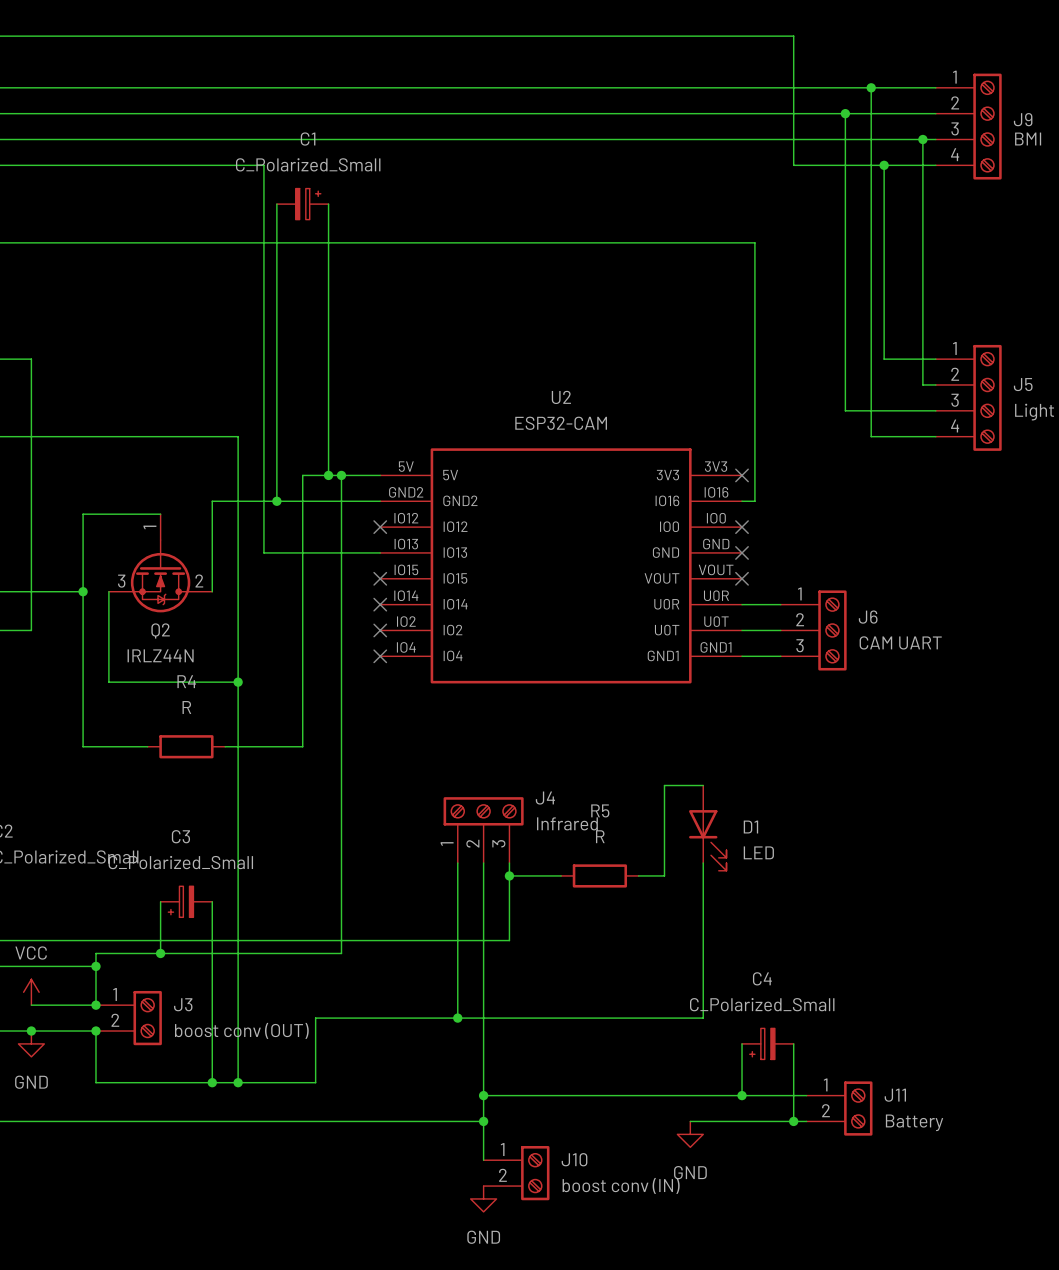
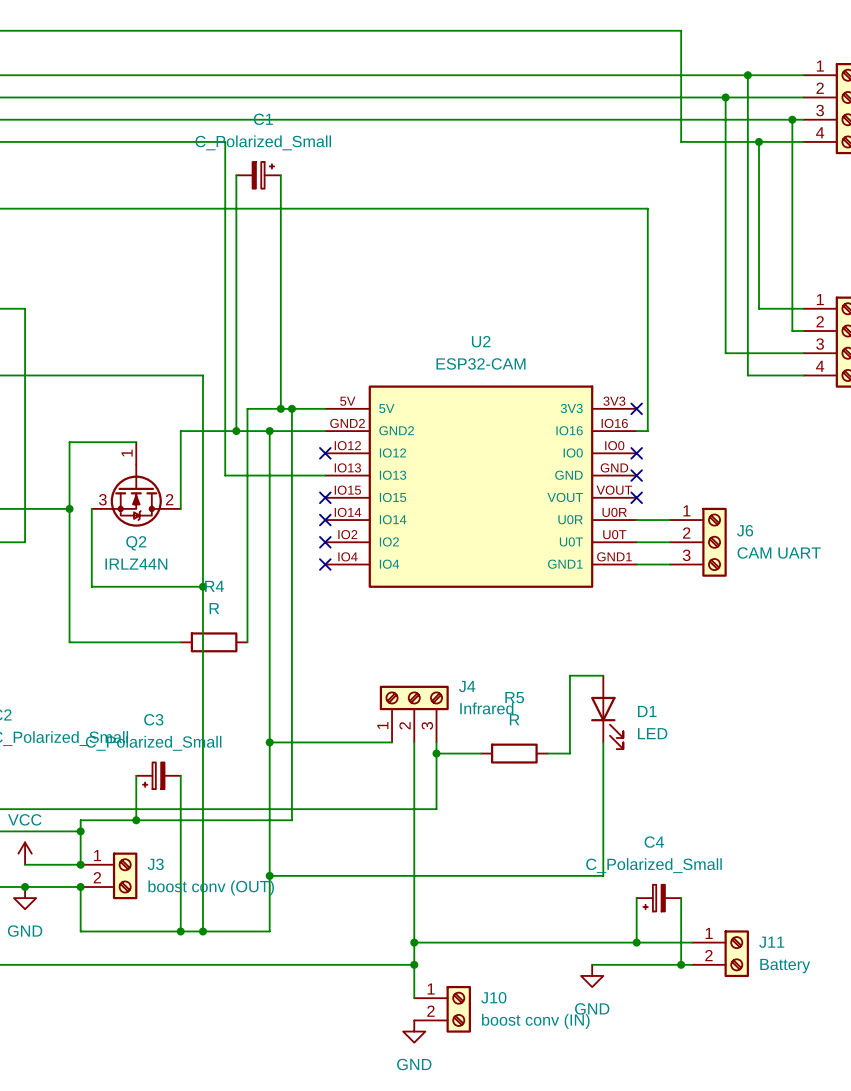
wire: (302, 475) (302, 746) (225, 746) -> (258, 408) (247, 408) (247, 642)
wire: none -> (269, 431) (269, 875)
junction: none -> (269, 431)
wire: none -> (125, 642) (180, 642)
R4 position: (186, 746) -> (214, 642)
junction: none -> (269, 742)
wire: (457, 863) (457, 1018) -> (392, 742) (269, 742)
junction: none -> (269, 875)
junction: (457, 1018) -> none

